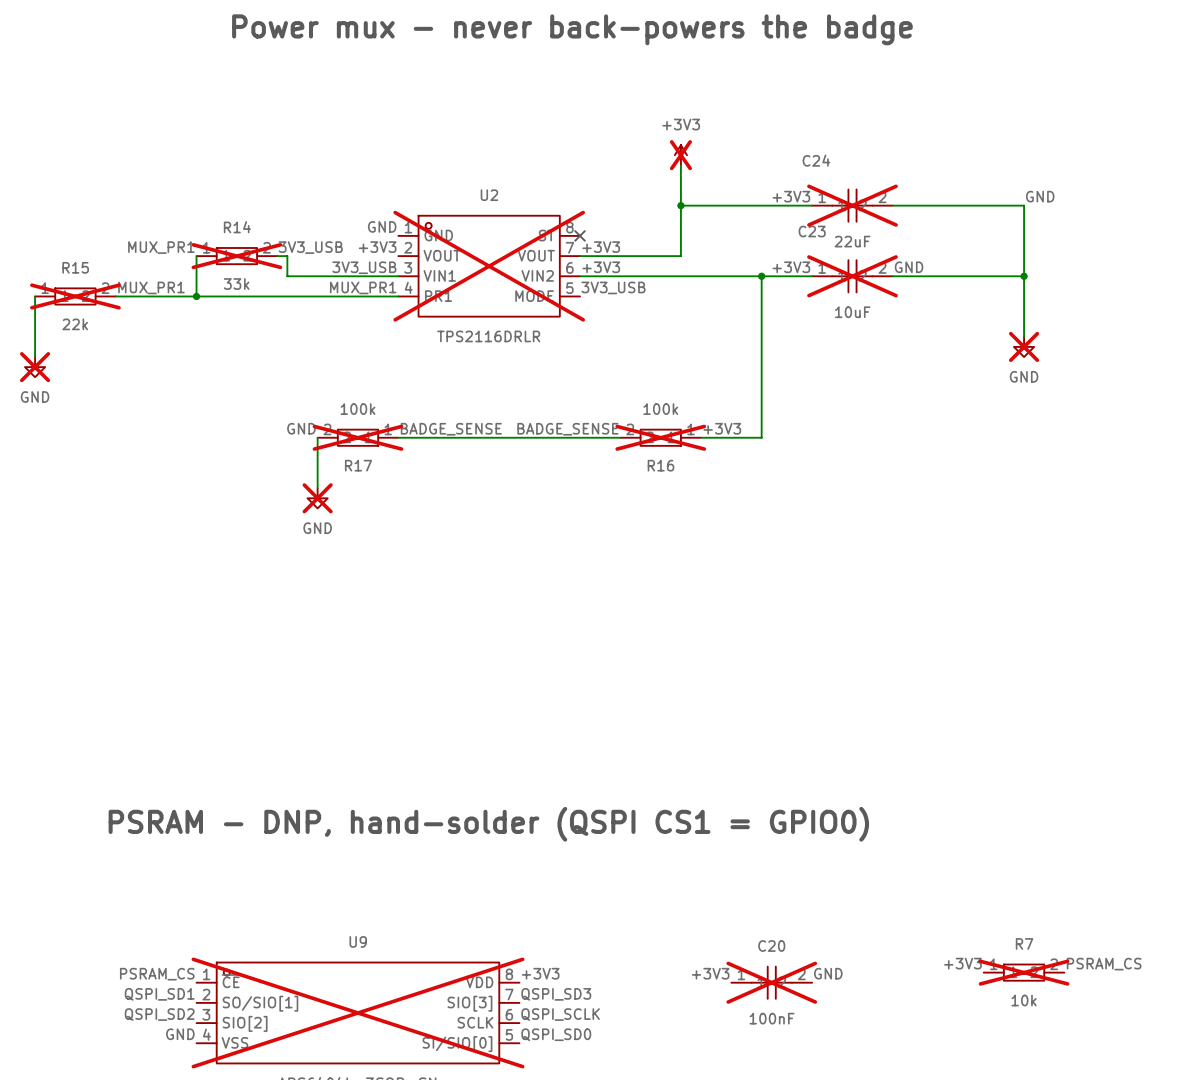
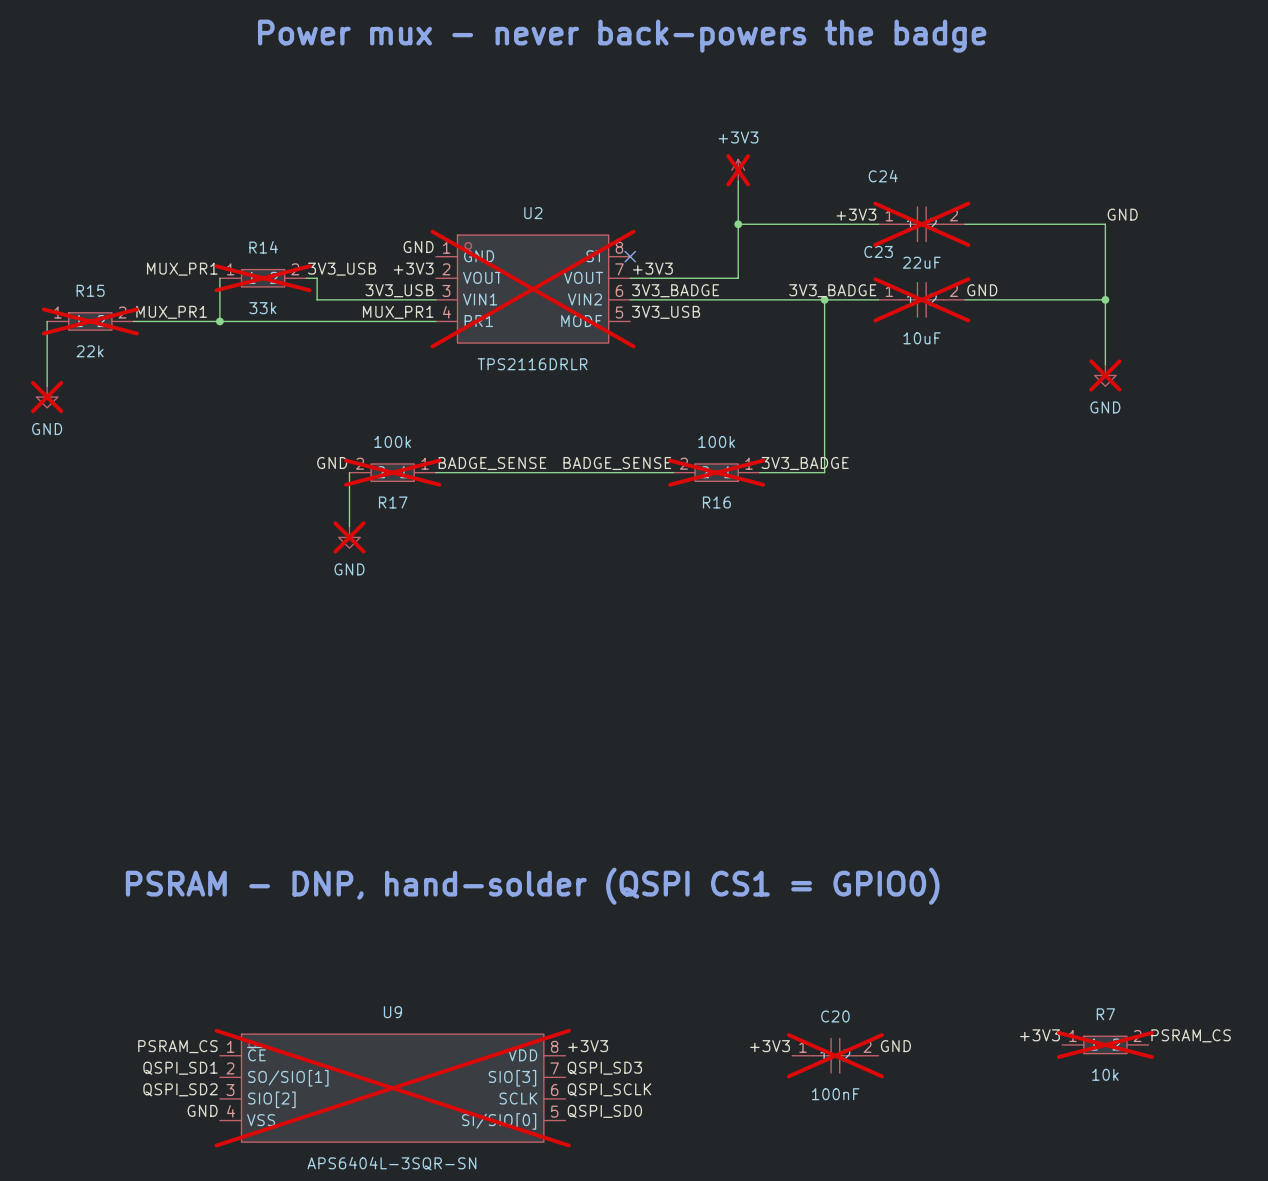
label: +3V3 (601, 267) -> 3V3_BADGE (675, 290)
label: +3V3 (791, 267) -> 3V3_BADGE (832, 290)
label: +3V3 (722, 428) -> 3V3_BADGE (805, 463)

